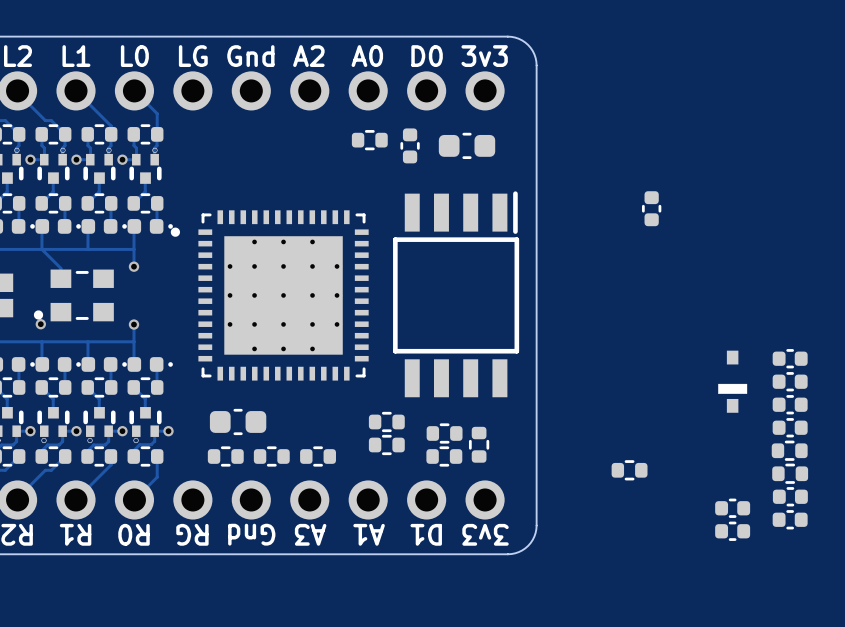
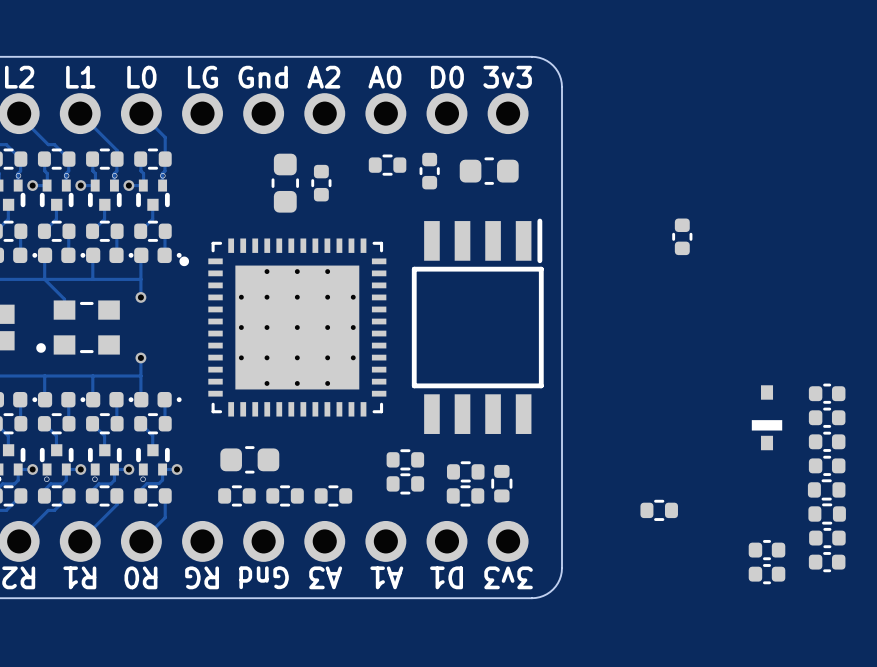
part: none -> (285, 183)
part: none -> (321, 183)
via: (40, 324) -> none

